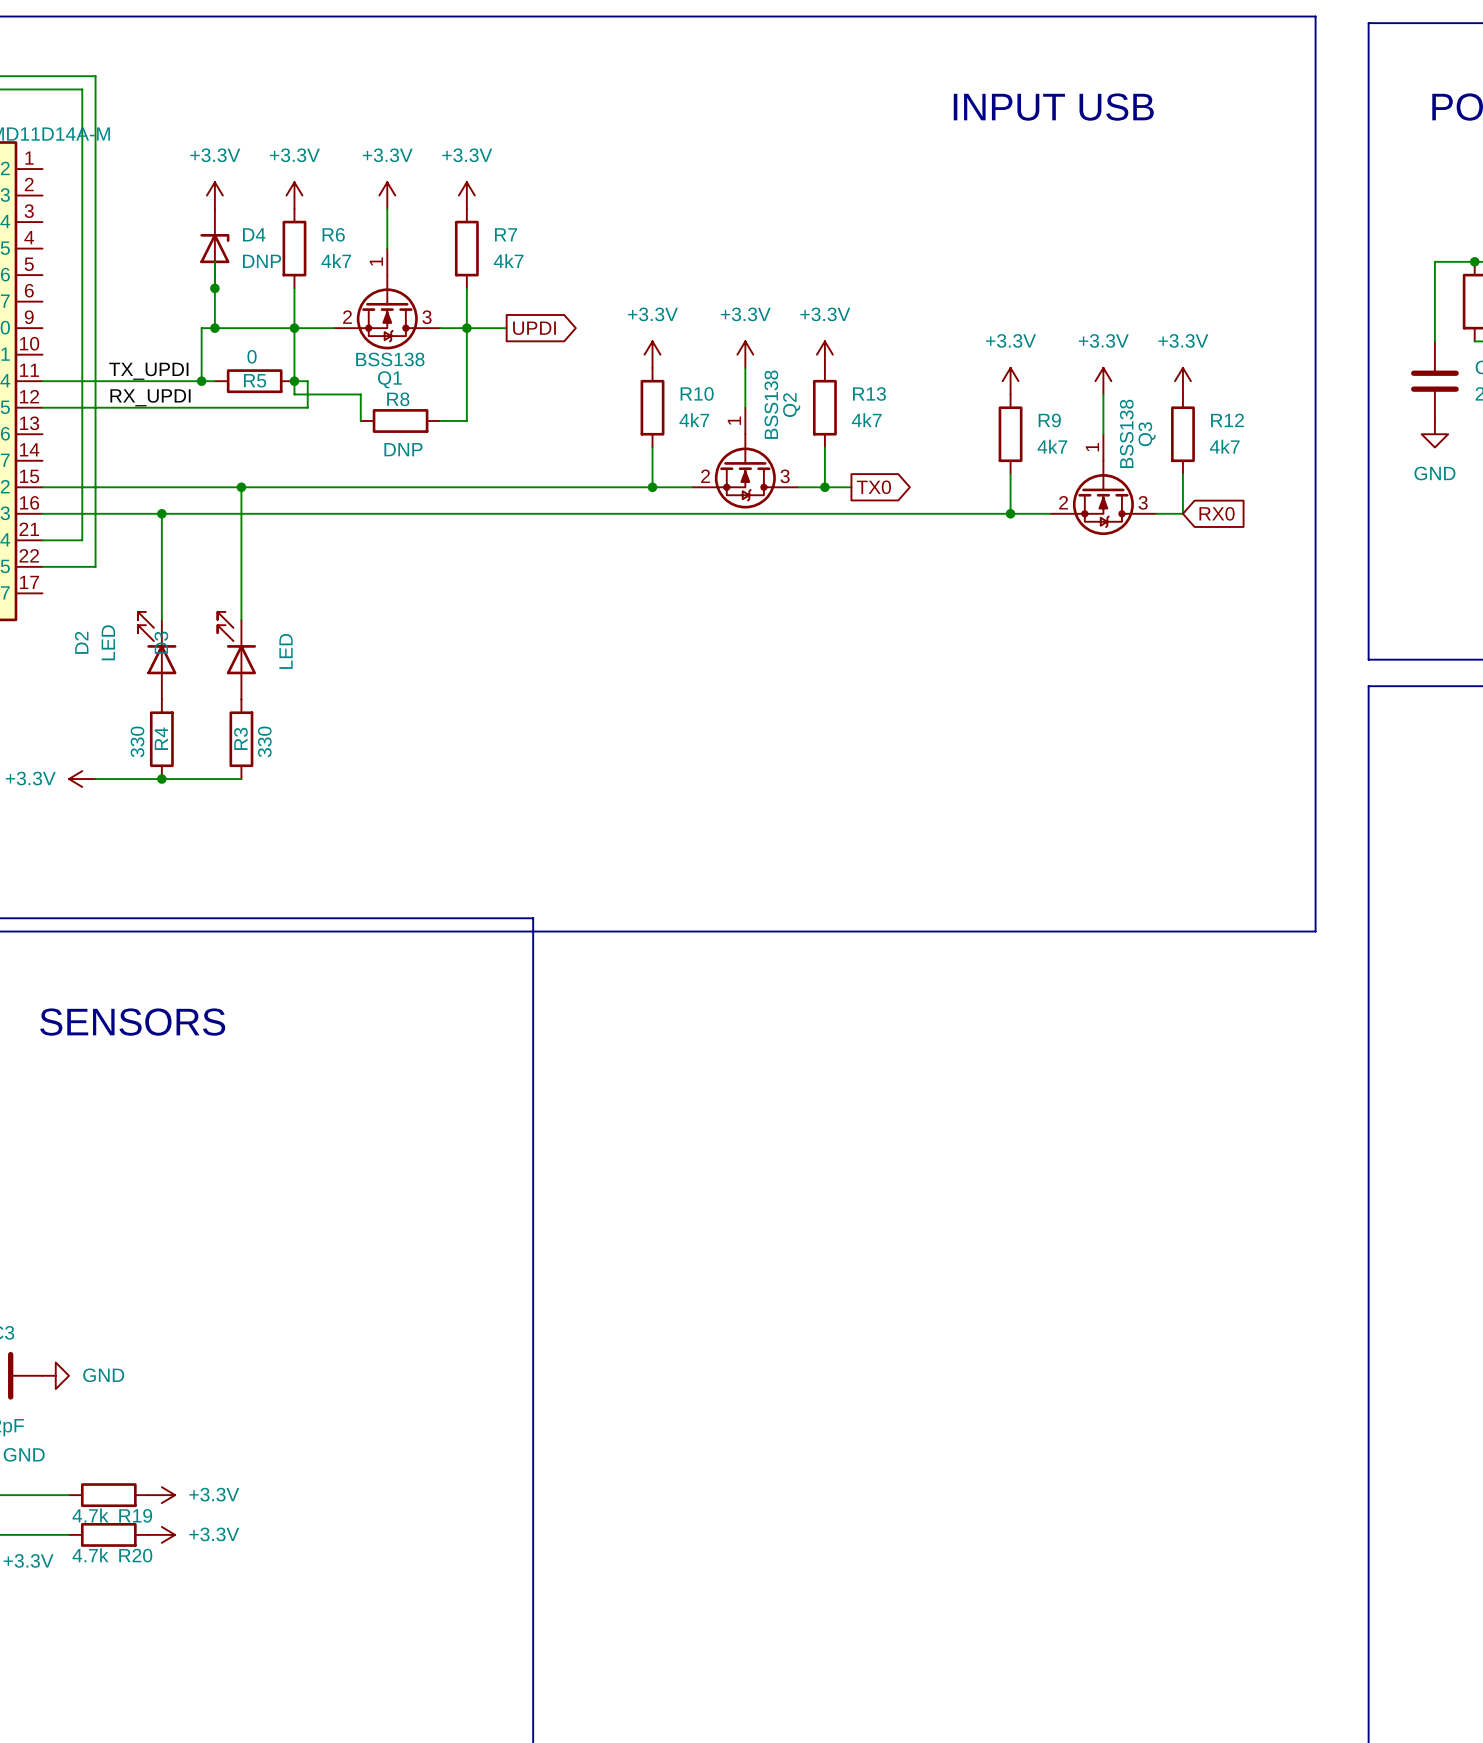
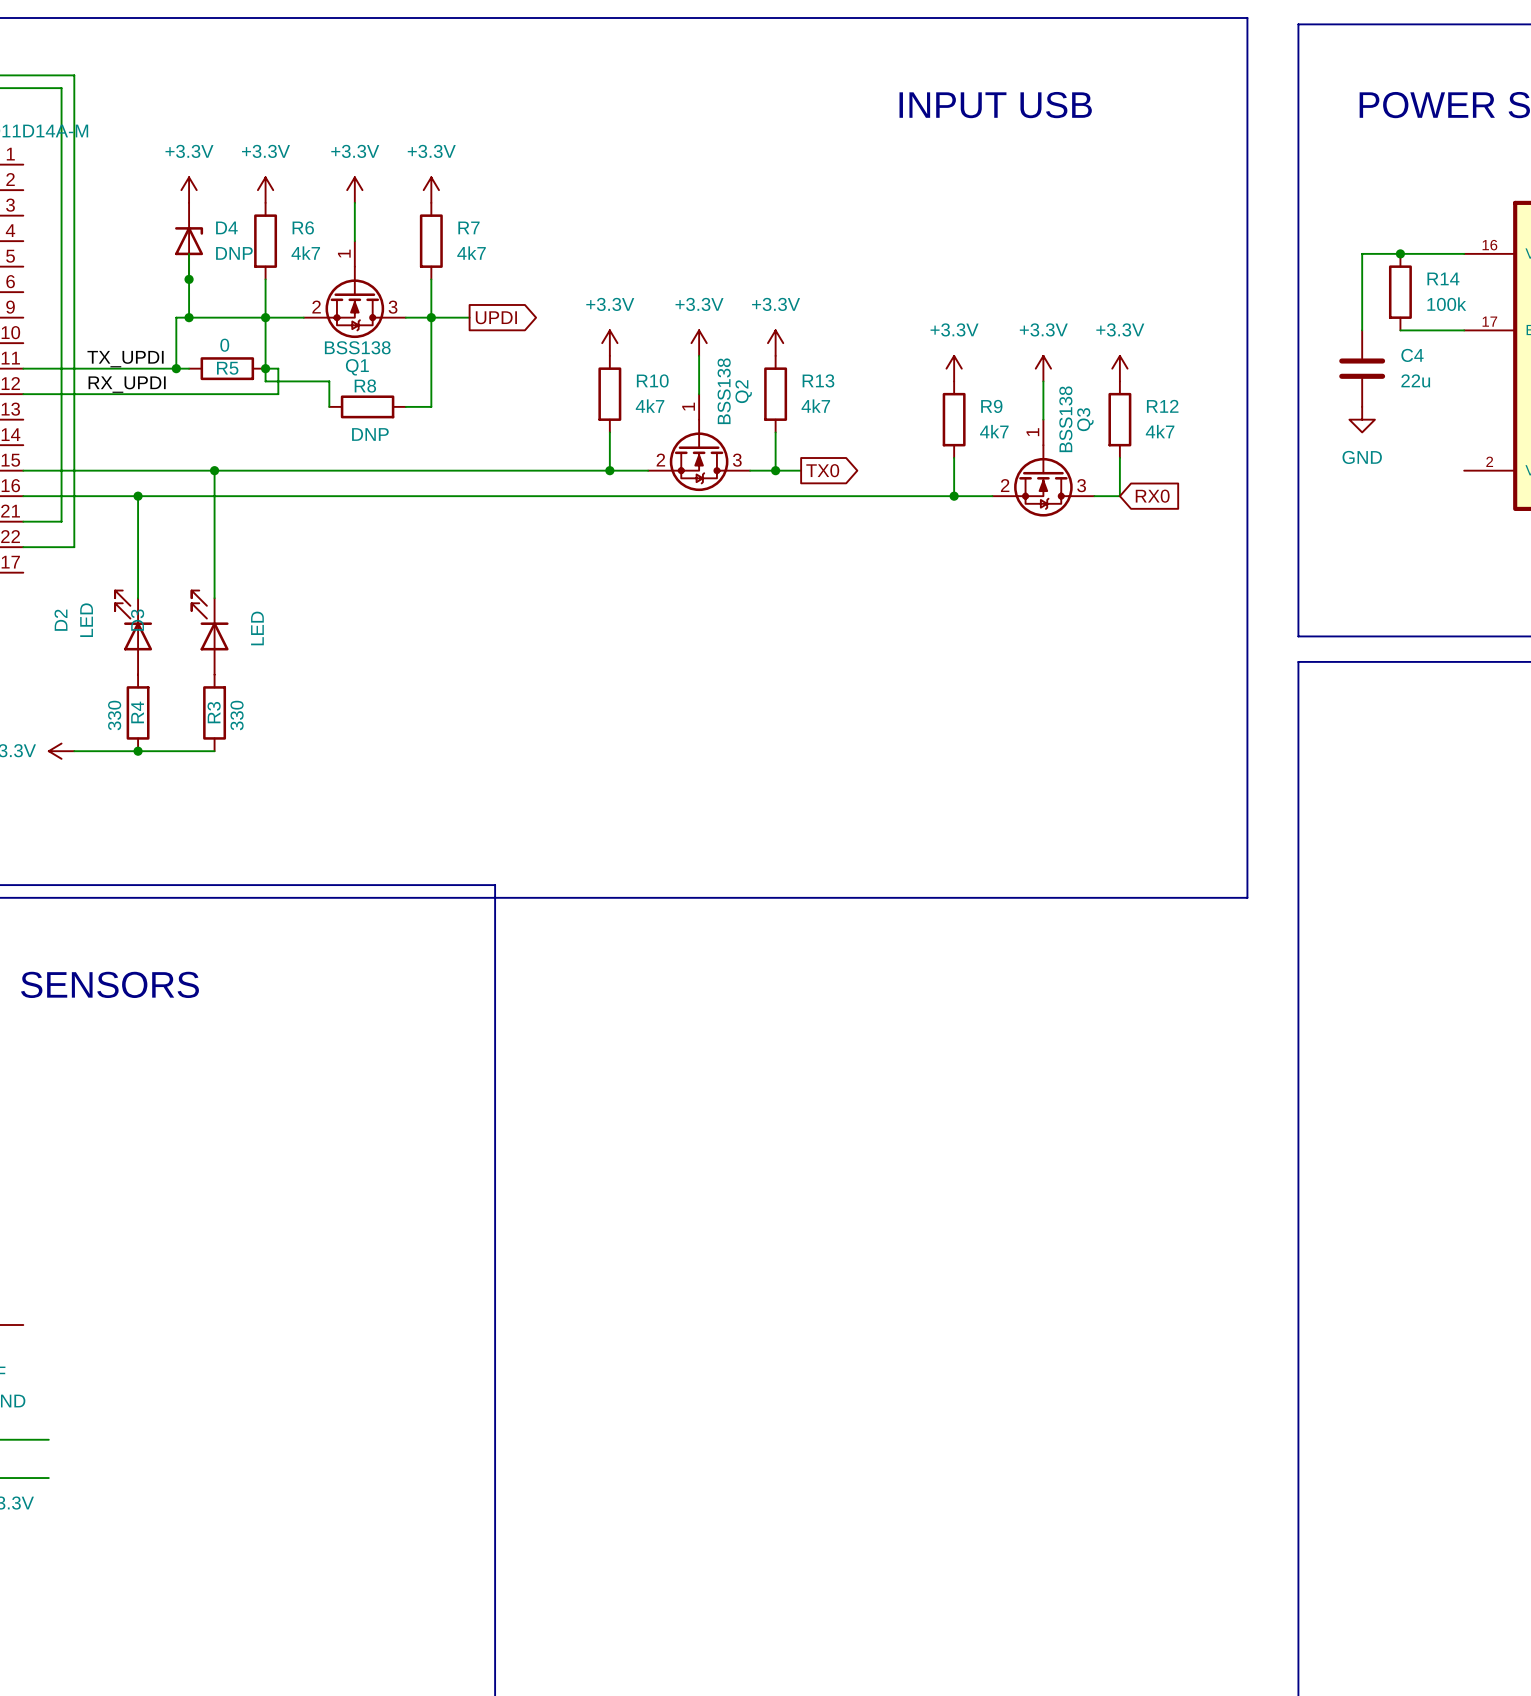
power symbol: GND (55, 1375) -> none
R19: 4.7k (108, 1495) -> none
power symbol: +3.3V (161, 1495) -> none
R20: 4.7k (108, 1534) -> none
power symbol: +3.3V (161, 1534) -> none

